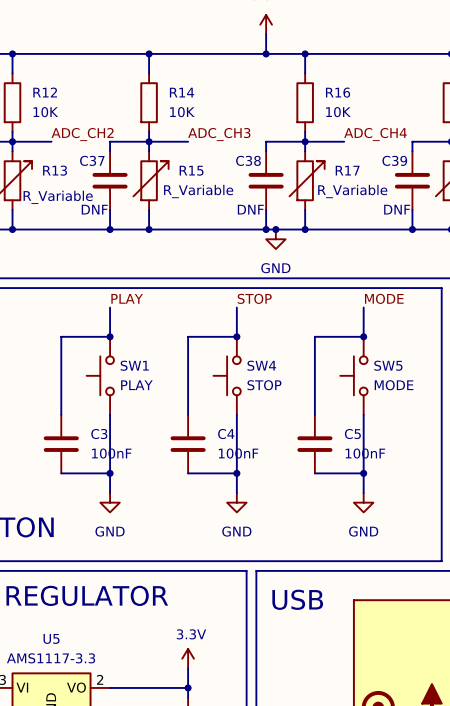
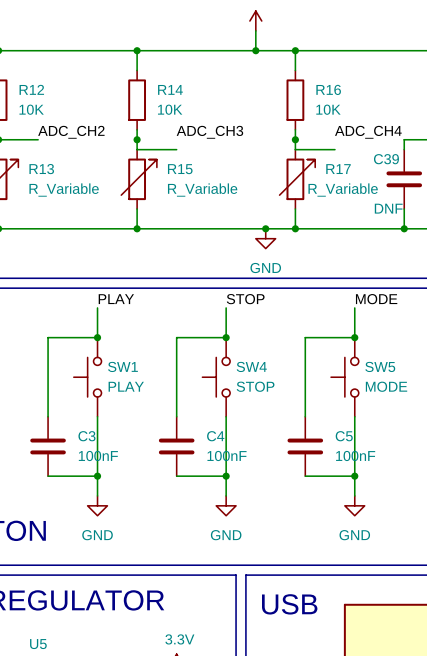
wire: (188, 141) (110, 141) (110, 151) -> none
wire: (344, 141) (266, 141) (266, 151) -> none
wire: none -> (137, 149) (176, 149)
wire: none -> (295, 149) (334, 149)
C37: DNF (110, 180) -> none
C38: DNF (266, 180) -> none
R15 value position: R_Variable (198, 191) -> R_Variable (202, 190)
R13 value position: R_Variable (58, 197) -> R_Variable (64, 190)
wire: (110, 210) (110, 229) -> none
wire: (266, 210) (266, 229) -> none
junction: (110, 229) -> none
junction: (266, 229) -> none

